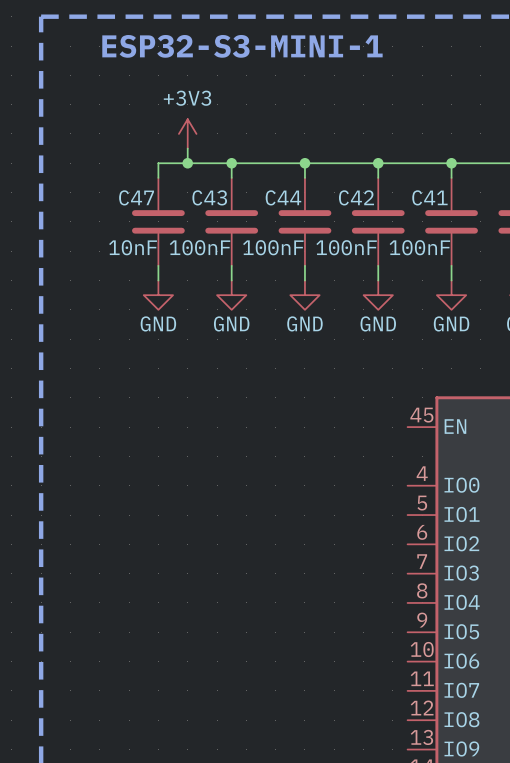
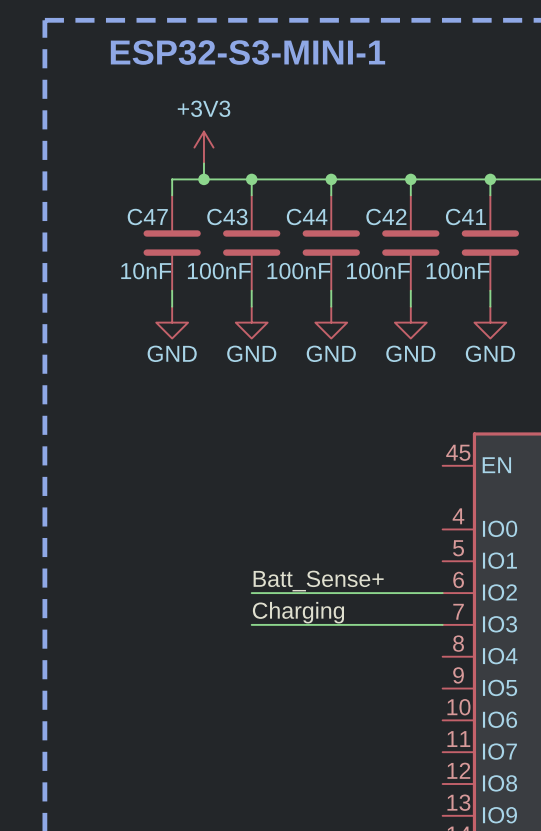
label: none -> Batt_Sense+ (318, 581)
wire: none -> (251, 593) (442, 593)
label: none -> Charging (298, 612)
wire: none -> (251, 624) (442, 624)

